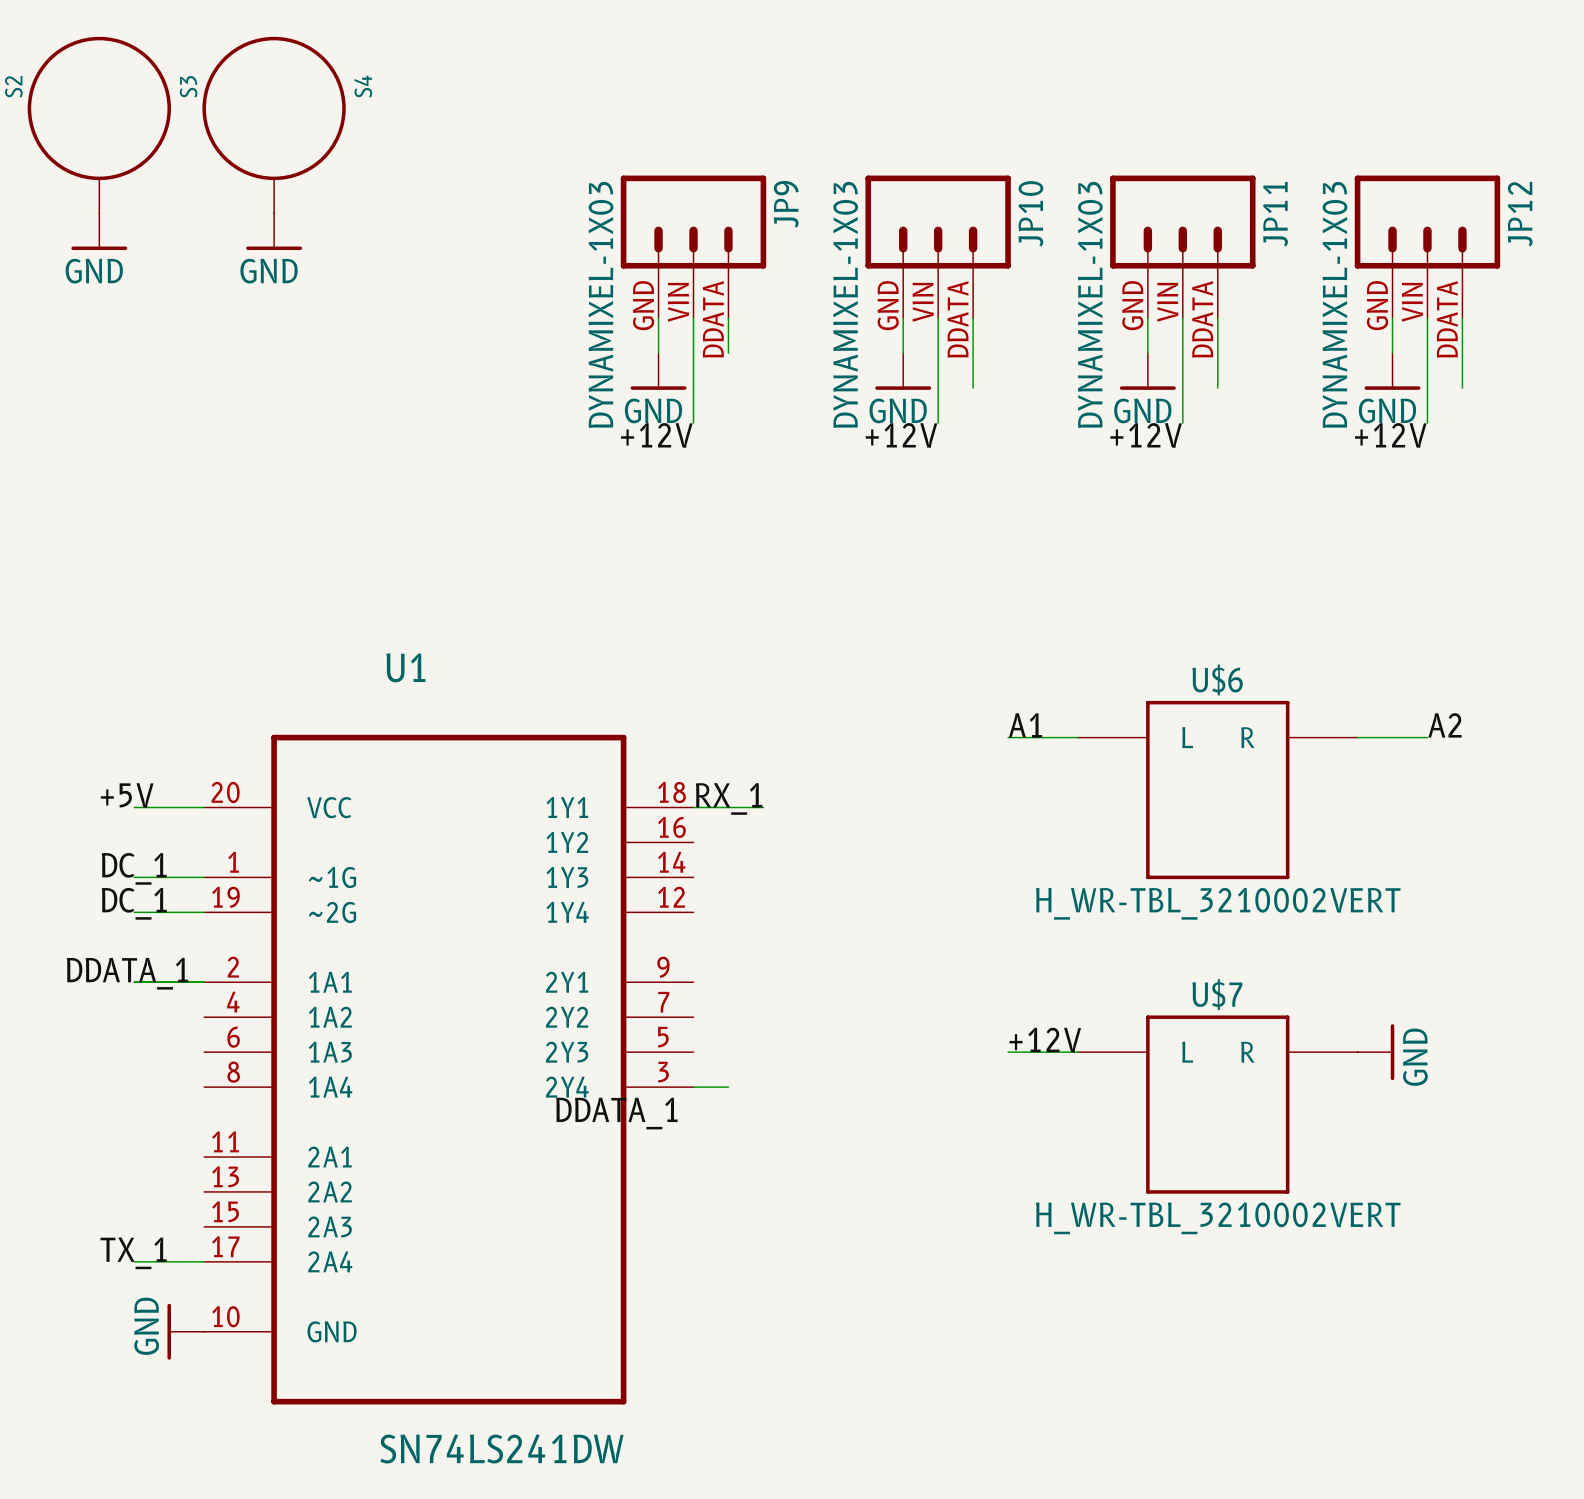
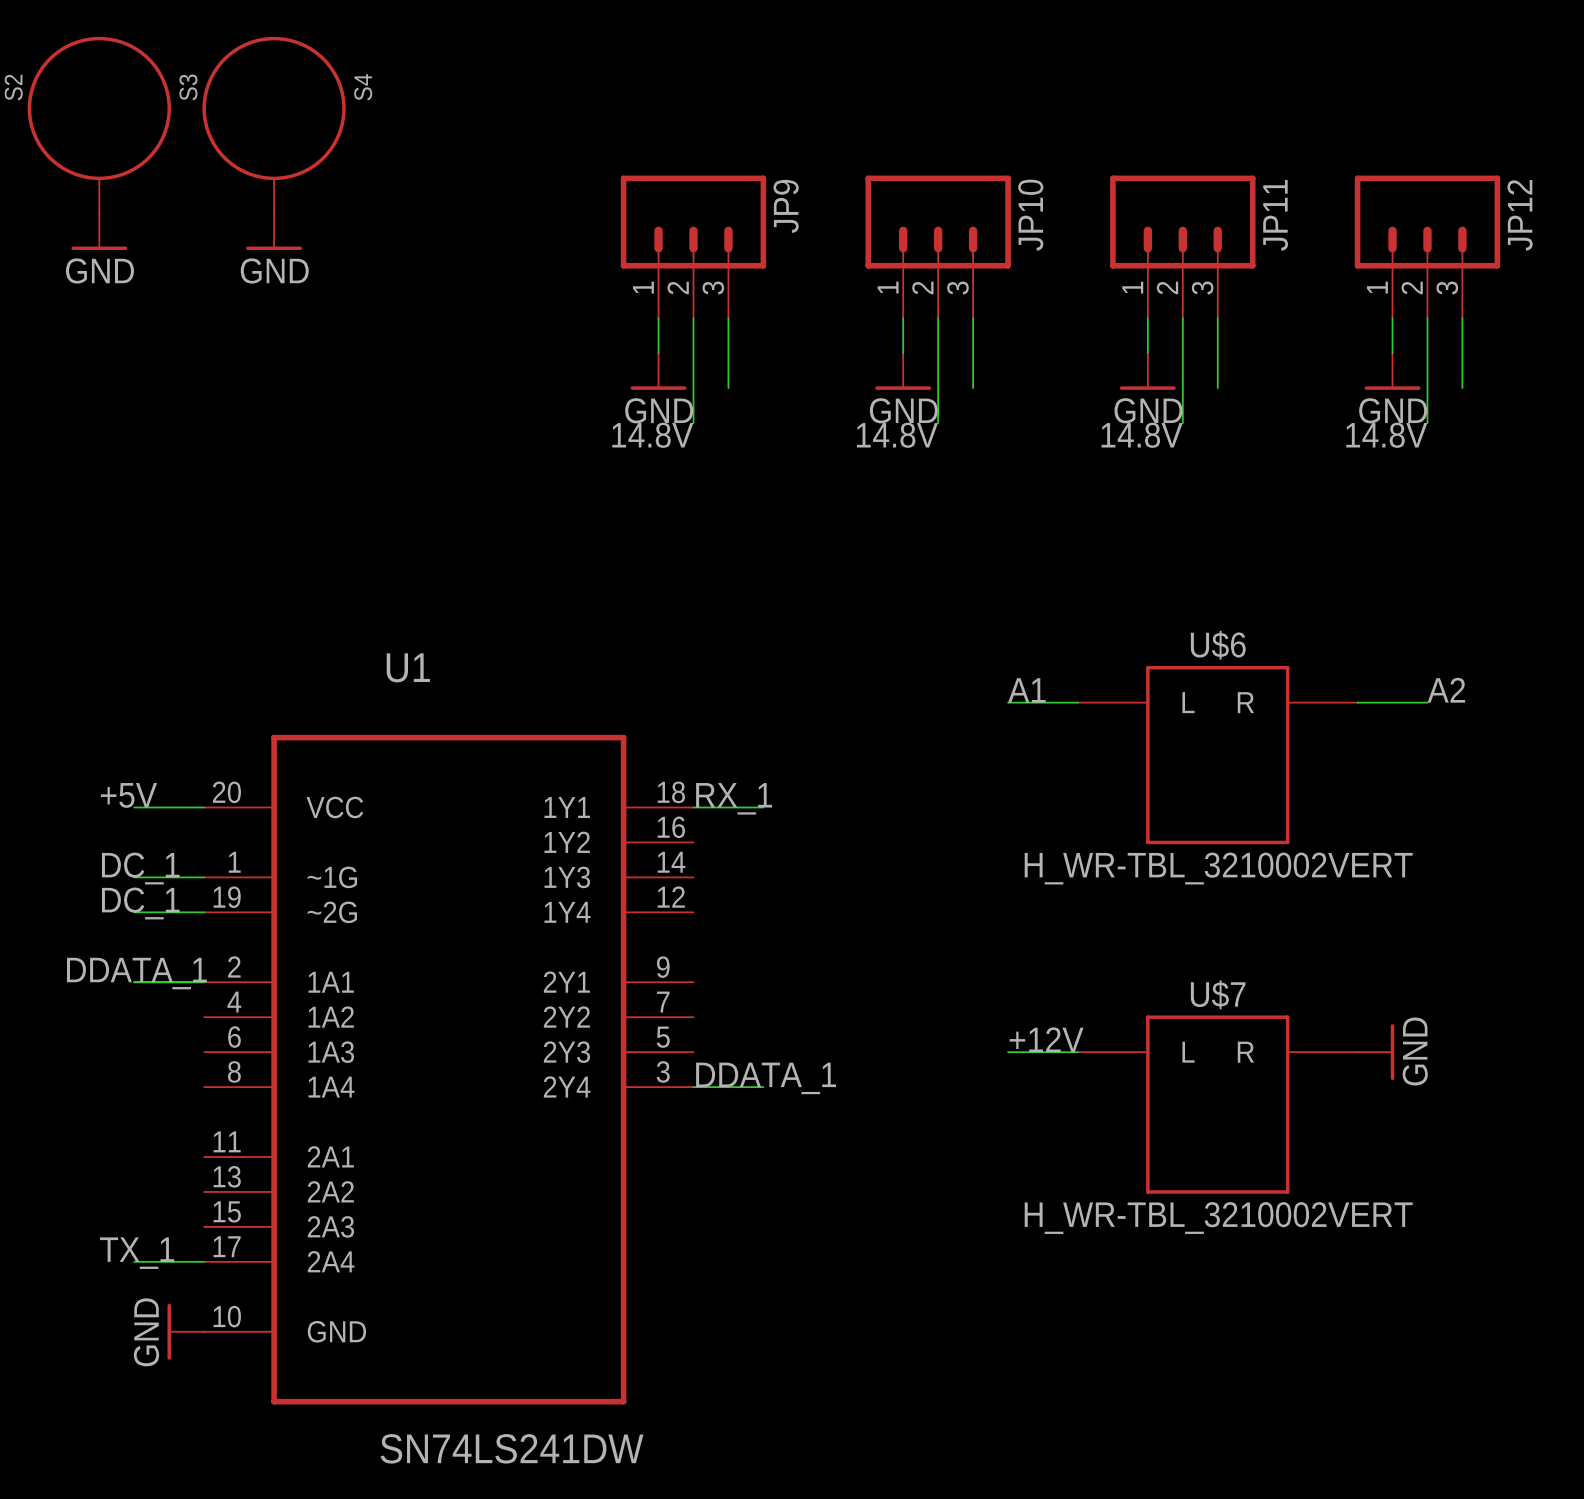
JP9 pin number: VIN (678, 302) -> 2 (678, 287)
JP10 pin number: VIN (923, 302) -> 2 (922, 287)
JP11 pin number: VIN (1167, 302) -> 2 (1167, 287)
JP12 pin number: VIN (1412, 302) -> 2 (1412, 287)
JP9 value: DYNAMIXEL-1X03 (601, 304) -> none
JP10 value: DYNAMIXEL-1X03 (845, 304) -> none
JP11 value: DYNAMIXEL-1X03 (1090, 304) -> none
JP12 value: DYNAMIXEL-1X03 (1334, 304) -> none
JP9 pin number: GND (643, 305) -> 1 (643, 287)
JP10 pin number: GND (888, 305) -> 1 (888, 287)
JP11 pin number: GND (1132, 305) -> 1 (1132, 287)
JP12 pin number: GND (1377, 305) -> 1 (1377, 287)
JP9 pin number: DDATA (713, 319) -> 3 (713, 288)
JP10 pin number: DDATA (957, 319) -> 3 (957, 288)
JP11 pin number: DDATA (1202, 319) -> 3 (1202, 288)
JP12 pin number: DDATA (1447, 319) -> 3 (1447, 288)
wire: none -> (728, 353) (728, 388)
label: +12V (656, 435) -> 14.8V (652, 435)
label: +12V (901, 435) -> 14.8V (897, 435)
label: +12V (1146, 435) -> 14.8V (1142, 435)
label: +12V (1390, 435) -> 14.8V (1386, 435)
label position: A1 (1025, 725) -> A1 (1026, 690)
label position: A2 (1444, 725) -> A2 (1446, 690)
wire: (1008, 737) (1077, 737) -> (1008, 702) (1077, 702)
wire: (1357, 737) (1427, 737) -> (1357, 702) (1427, 702)
U$6 position: (1217, 790) -> (1217, 755)
wire: none -> (728, 1087) (763, 1087)
label position: DDATA_1 (616, 1113) -> DDATA_1 (766, 1078)

